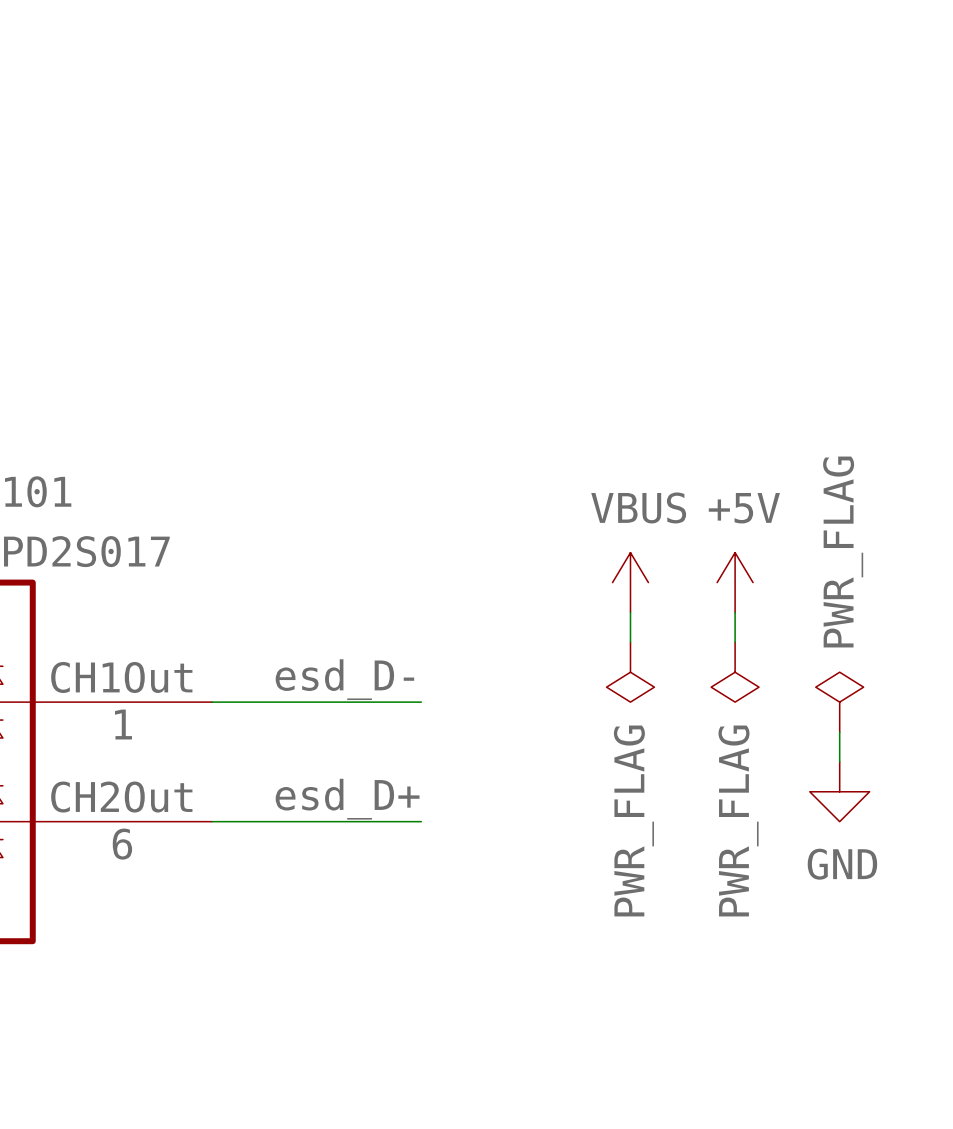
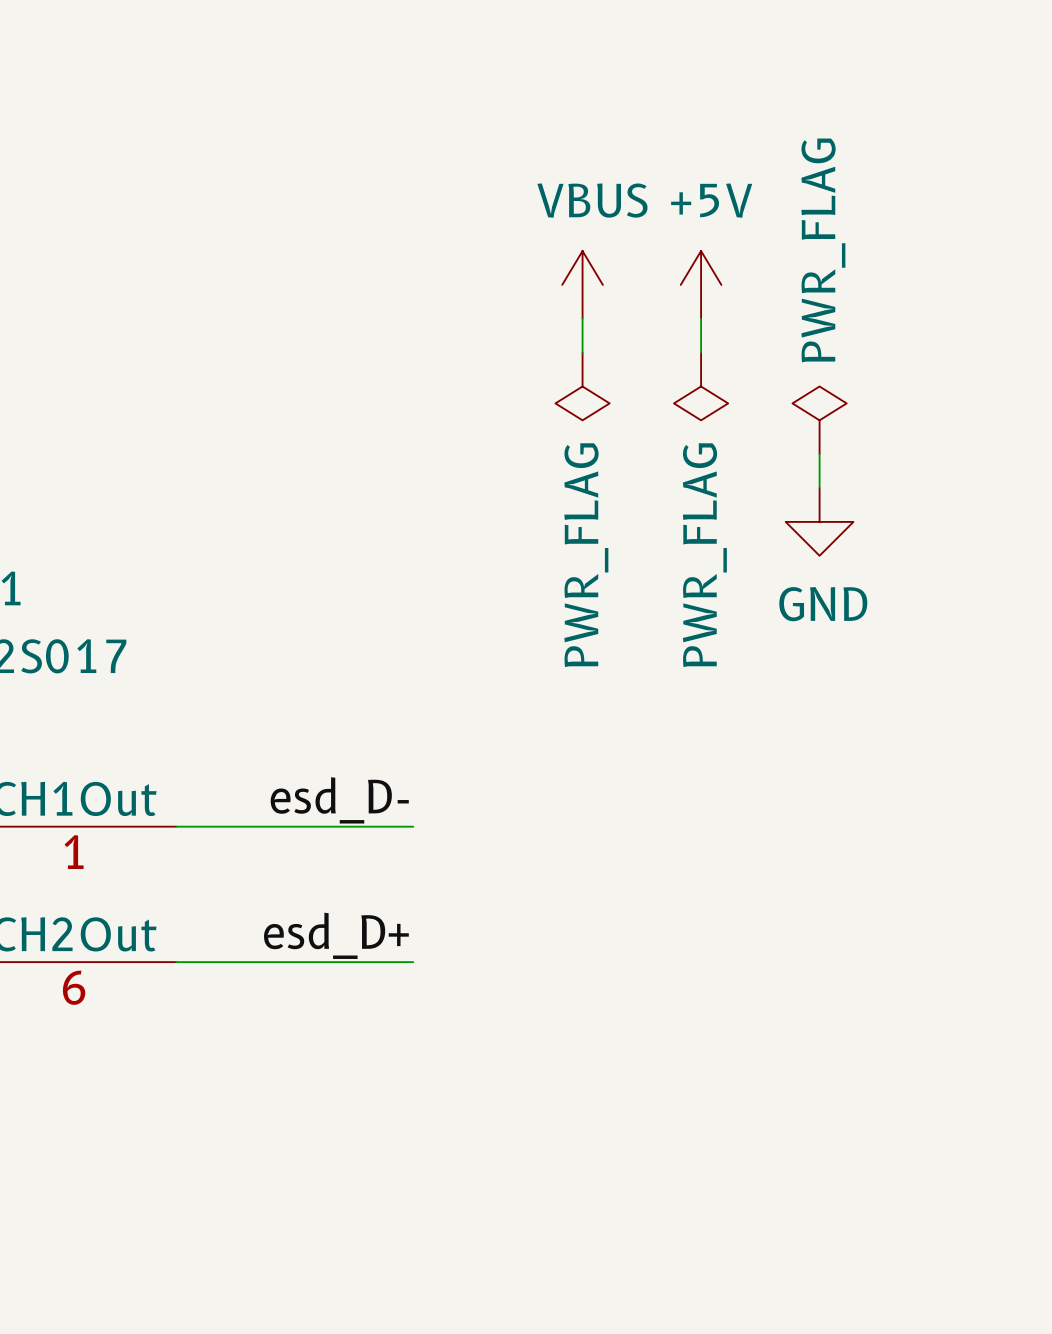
power symbol: none -> PWR_FLAG (582, 386)
power symbol: none -> PWR_FLAG (701, 386)
power symbol: none -> PWR_FLAG (819, 420)
power symbol position: VBUS (630, 582) -> VBUS (582, 284)
power symbol position: +5V (735, 582) -> +5V (701, 284)
wire: (630, 612) (630, 642) -> (582, 318) (582, 352)
wire: (735, 612) (735, 642) -> (701, 318) (701, 352)
power symbol: PWR_FLAG (630, 672) -> none
power symbol: PWR_FLAG (735, 672) -> none
power symbol: PWR_FLAG (839, 702) -> none
wire: (839, 732) (839, 761) -> (819, 454) (819, 488)
power symbol position: GND (839, 791) -> GND (819, 521)

